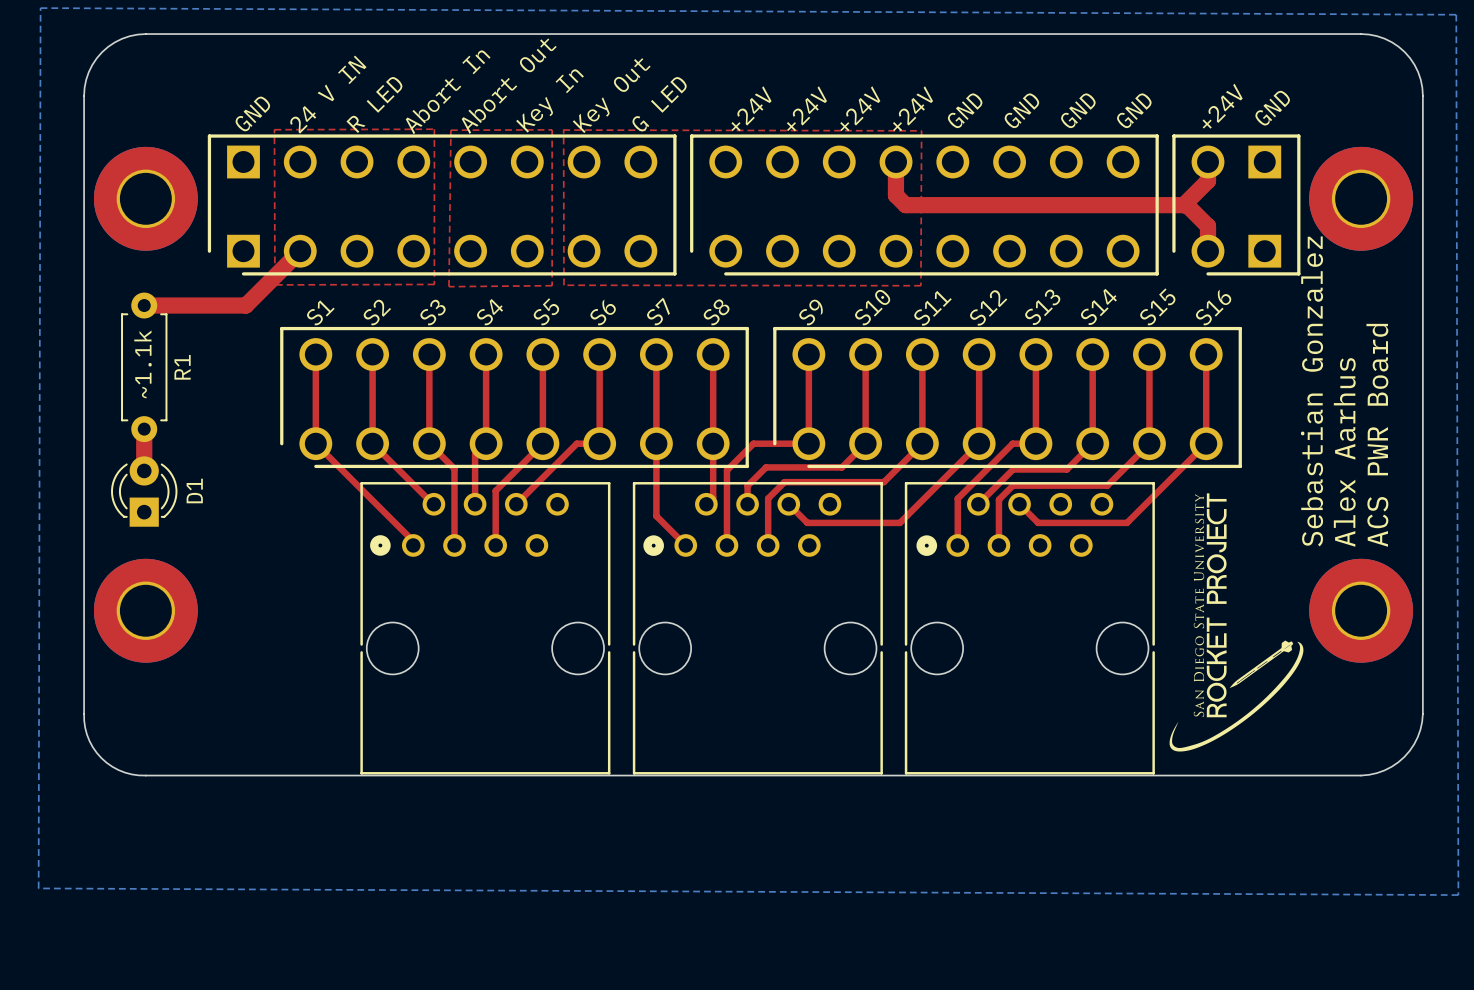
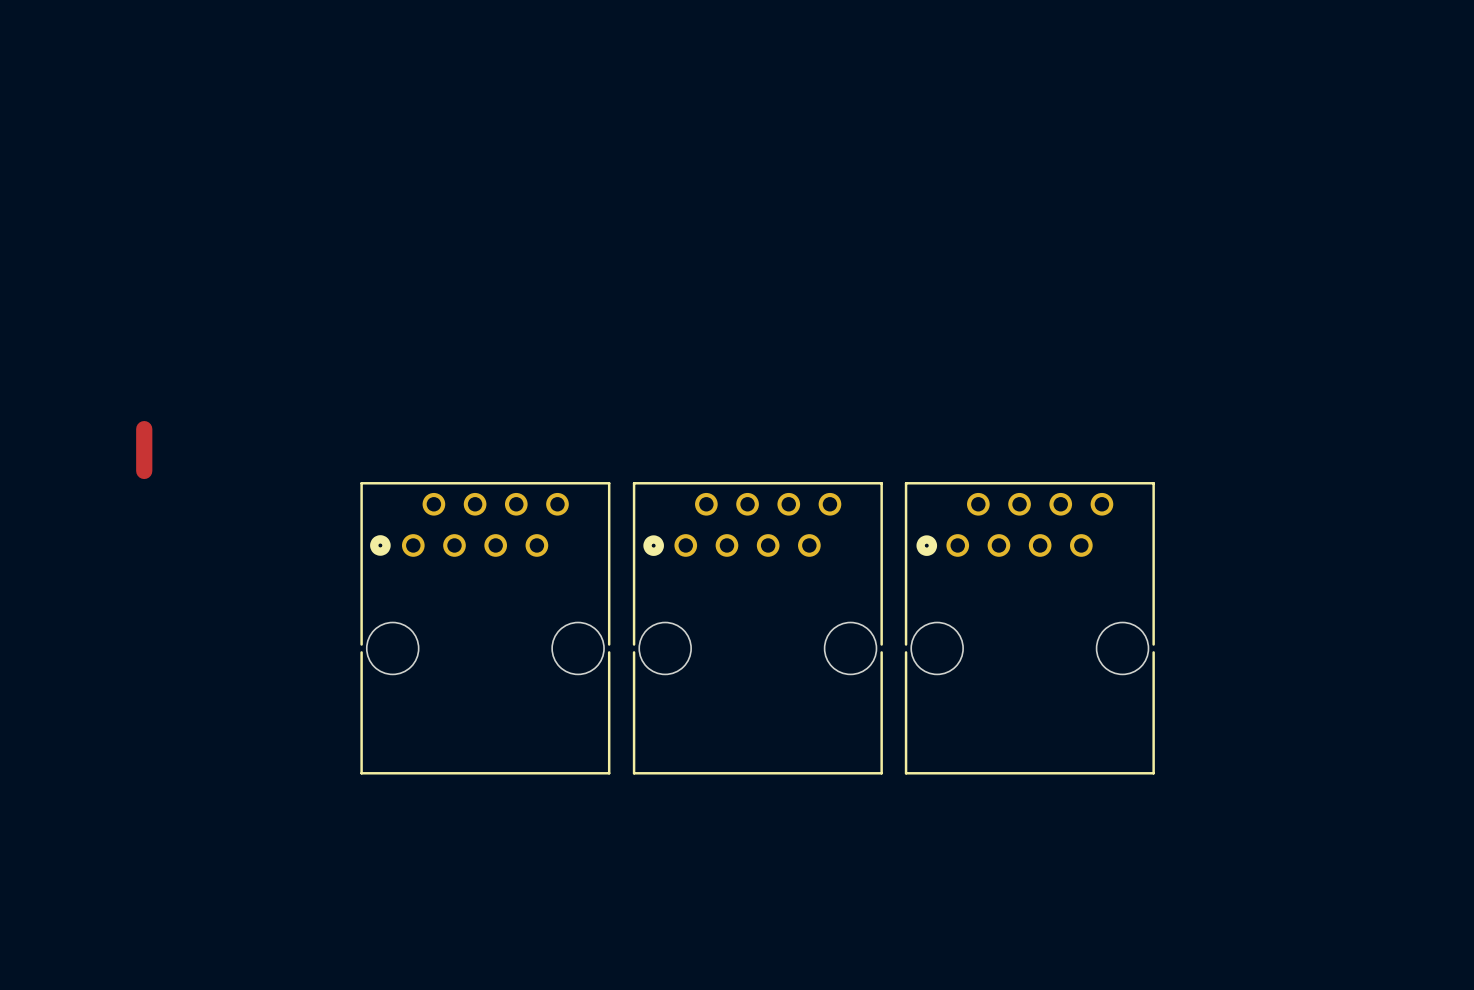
bottom zone outline: (40, 8) (38, 888) (1458, 895) (1456, 14) (40, 8) -> none
board edge: (145, 34) (1361, 34) (1377, 36) (1392, 42) (1404, 52) (1414, 64) (1420, 79) (1422, 95) (1422, 713) (1420, 729) (1414, 744) (1404, 756) (1391, 766) (1376, 773) (1361, 775) (145, 775) (125, 772) (112, 766) (101, 758) (92, 747) (86, 734) (84, 720) (84, 95) (88, 72) (102, 52) (122, 38) (145, 34) -> none
text: Abort Out (509, 86) -> none
text: Abort In (448, 92) -> none
text: 24 V IN (328, 94) -> none
text: Key Out (611, 95) -> none
text: Key In (550, 100) -> none
text: R LED (374, 104) -> none
text: G LED (659, 104) -> none
text: +24V (1222, 106) -> none
text: +24V (751, 108) -> none
text: +24V (806, 108) -> none
text: +24V (860, 108) -> none
text: +24V (913, 108) -> none
text: GND (1272, 108) -> none
text: GND (965, 110) -> none
text: GND (1021, 110) -> none
text: GND (1078, 110) -> none
text: GND (1134, 110) -> none
text: GND (252, 114) -> none
top zone outline: (434, 129) (434, 284) (274, 284) (274, 129) (434, 129) -> none
top zone outline: (552, 129) (552, 285) (448, 286) (450, 130) (552, 129) -> none
top zone outline: (563, 130) (921, 130) (920, 285) (563, 285) (563, 130) -> none
top track: (1208, 161) (1208, 180) (1183, 205) -> none
top track: (895, 162) (895, 195) (905, 205) (1186, 205) (1208, 226) (1208, 251) -> none
part: (145, 198) -> none
part: (1361, 198) -> none
part: (442, 204) -> none
part: (924, 204) -> none
part: (1236, 204) -> none
top track: (300, 251) (245, 305) (144, 305) -> none
text: S14 (1098, 306) -> none
text: S15 (1157, 306) -> none
text: S10 (872, 307) -> none
text: S13 (1042, 307) -> none
text: S16 (1213, 307) -> none
text: S11 (932, 308) -> none
text: S12 (988, 308) -> none
text: S5 (546, 311) -> none
text: S7 (658, 311) -> none
text: S1 (320, 312) -> none
text: S2 (377, 312) -> none
text: S3 (432, 312) -> none
text: S4 (489, 312) -> none
text: S6 (602, 312) -> none
text: S8 (716, 312) -> none
text: S9 (810, 312) -> none
top track: (315, 354) (315, 443) (413, 541) (413, 545) -> none
top track: (372, 354) (372, 443) (433, 504) -> none
top track: (429, 354) (429, 443) (454, 468) (454, 545) -> none
top track: (486, 354) (486, 443) (475, 454) (475, 504) -> none
top track: (542, 354) (542, 443) (495, 490) (495, 545) -> none
top track: (599, 354) (599, 443) (576, 443) (516, 504) -> none
top track: (656, 354) (656, 516) (685, 545) -> none
top track: (713, 354) (713, 497) (706, 504) -> none
top track: (808, 354) (808, 443) (753, 443) (726, 470) (726, 545) -> none
top track: (865, 354) (865, 443) (841, 467) (766, 467) (747, 485) (747, 504) -> none
top track: (922, 354) (922, 443) (883, 482) (784, 482) (768, 498) (768, 545) -> none
top track: (979, 354) (979, 443) (899, 522) (807, 522) (788, 504) -> none
top track: (1035, 354) (1035, 443) (1012, 443) (957, 498) (957, 545) -> none
top track: (1092, 354) (1092, 443) (1066, 469) (1013, 469) (978, 504) -> none
top track: (1149, 354) (1149, 443) (1107, 485) (1012, 485) (998, 499) (998, 545) -> none
top track: (1206, 354) (1206, 443) (1127, 522) (1038, 522) (1019, 504) -> none
text: ~1.1k (143, 364) -> none
R1: (144, 367) -> none
text: Sebastian Gonzalez (1312, 391) -> none
part: (514, 397) -> none
part: (1007, 397) -> none
text: ACS PWR Board (1377, 435) -> none
text: Alex Aarhus (1344, 452) -> none
D1: (144, 491) -> none
drawing: [1169, 493, 1304, 752] -> none
part: (145, 610) -> none
part: (1361, 610) -> none

